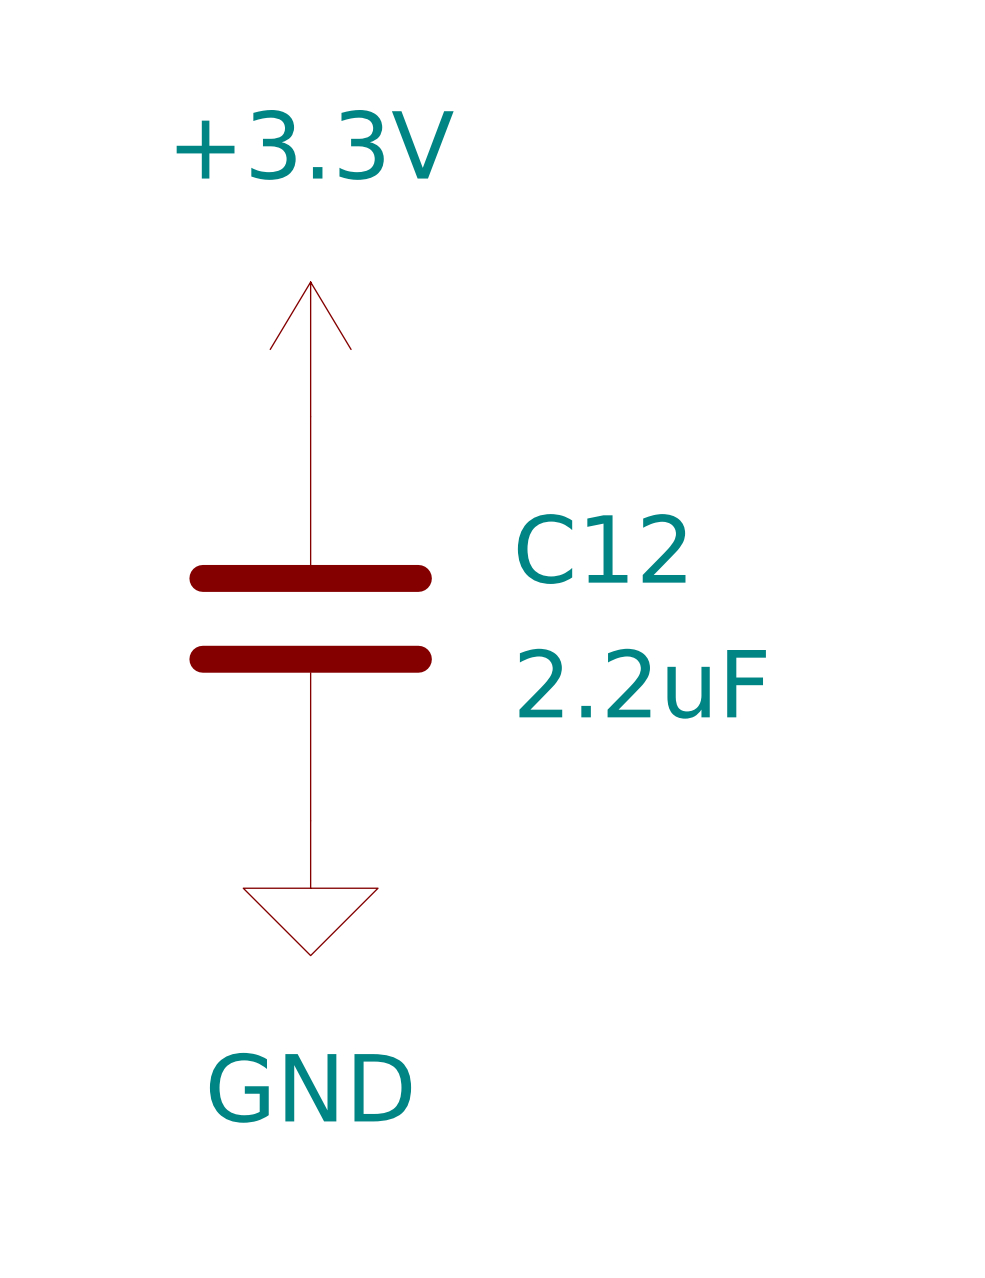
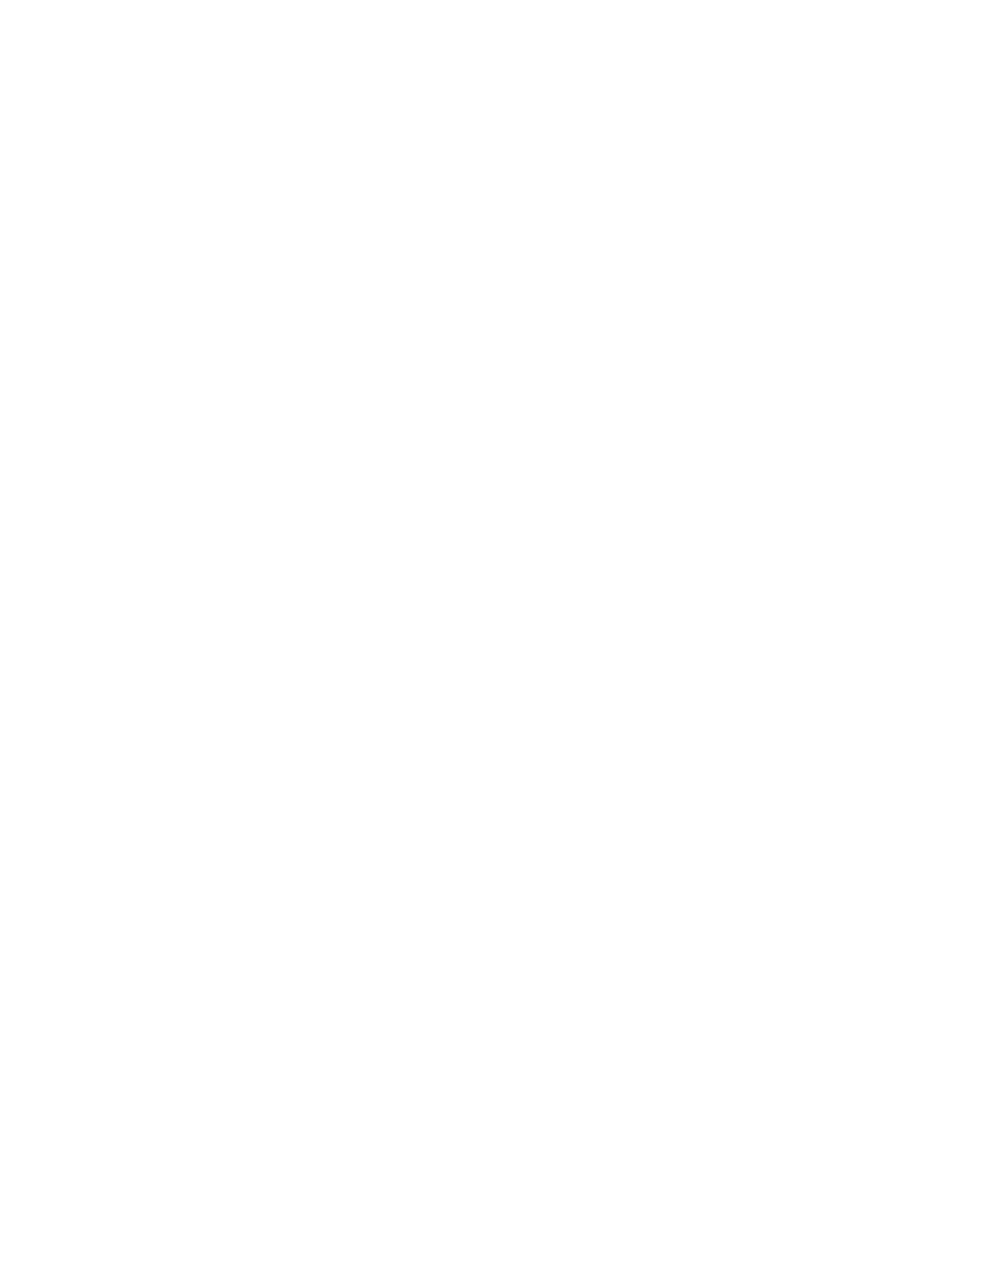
power symbol: +3.3V (310, 349) -> none
C12: 2.2uF (310, 618) -> none
power symbol: GND (310, 888) -> none

